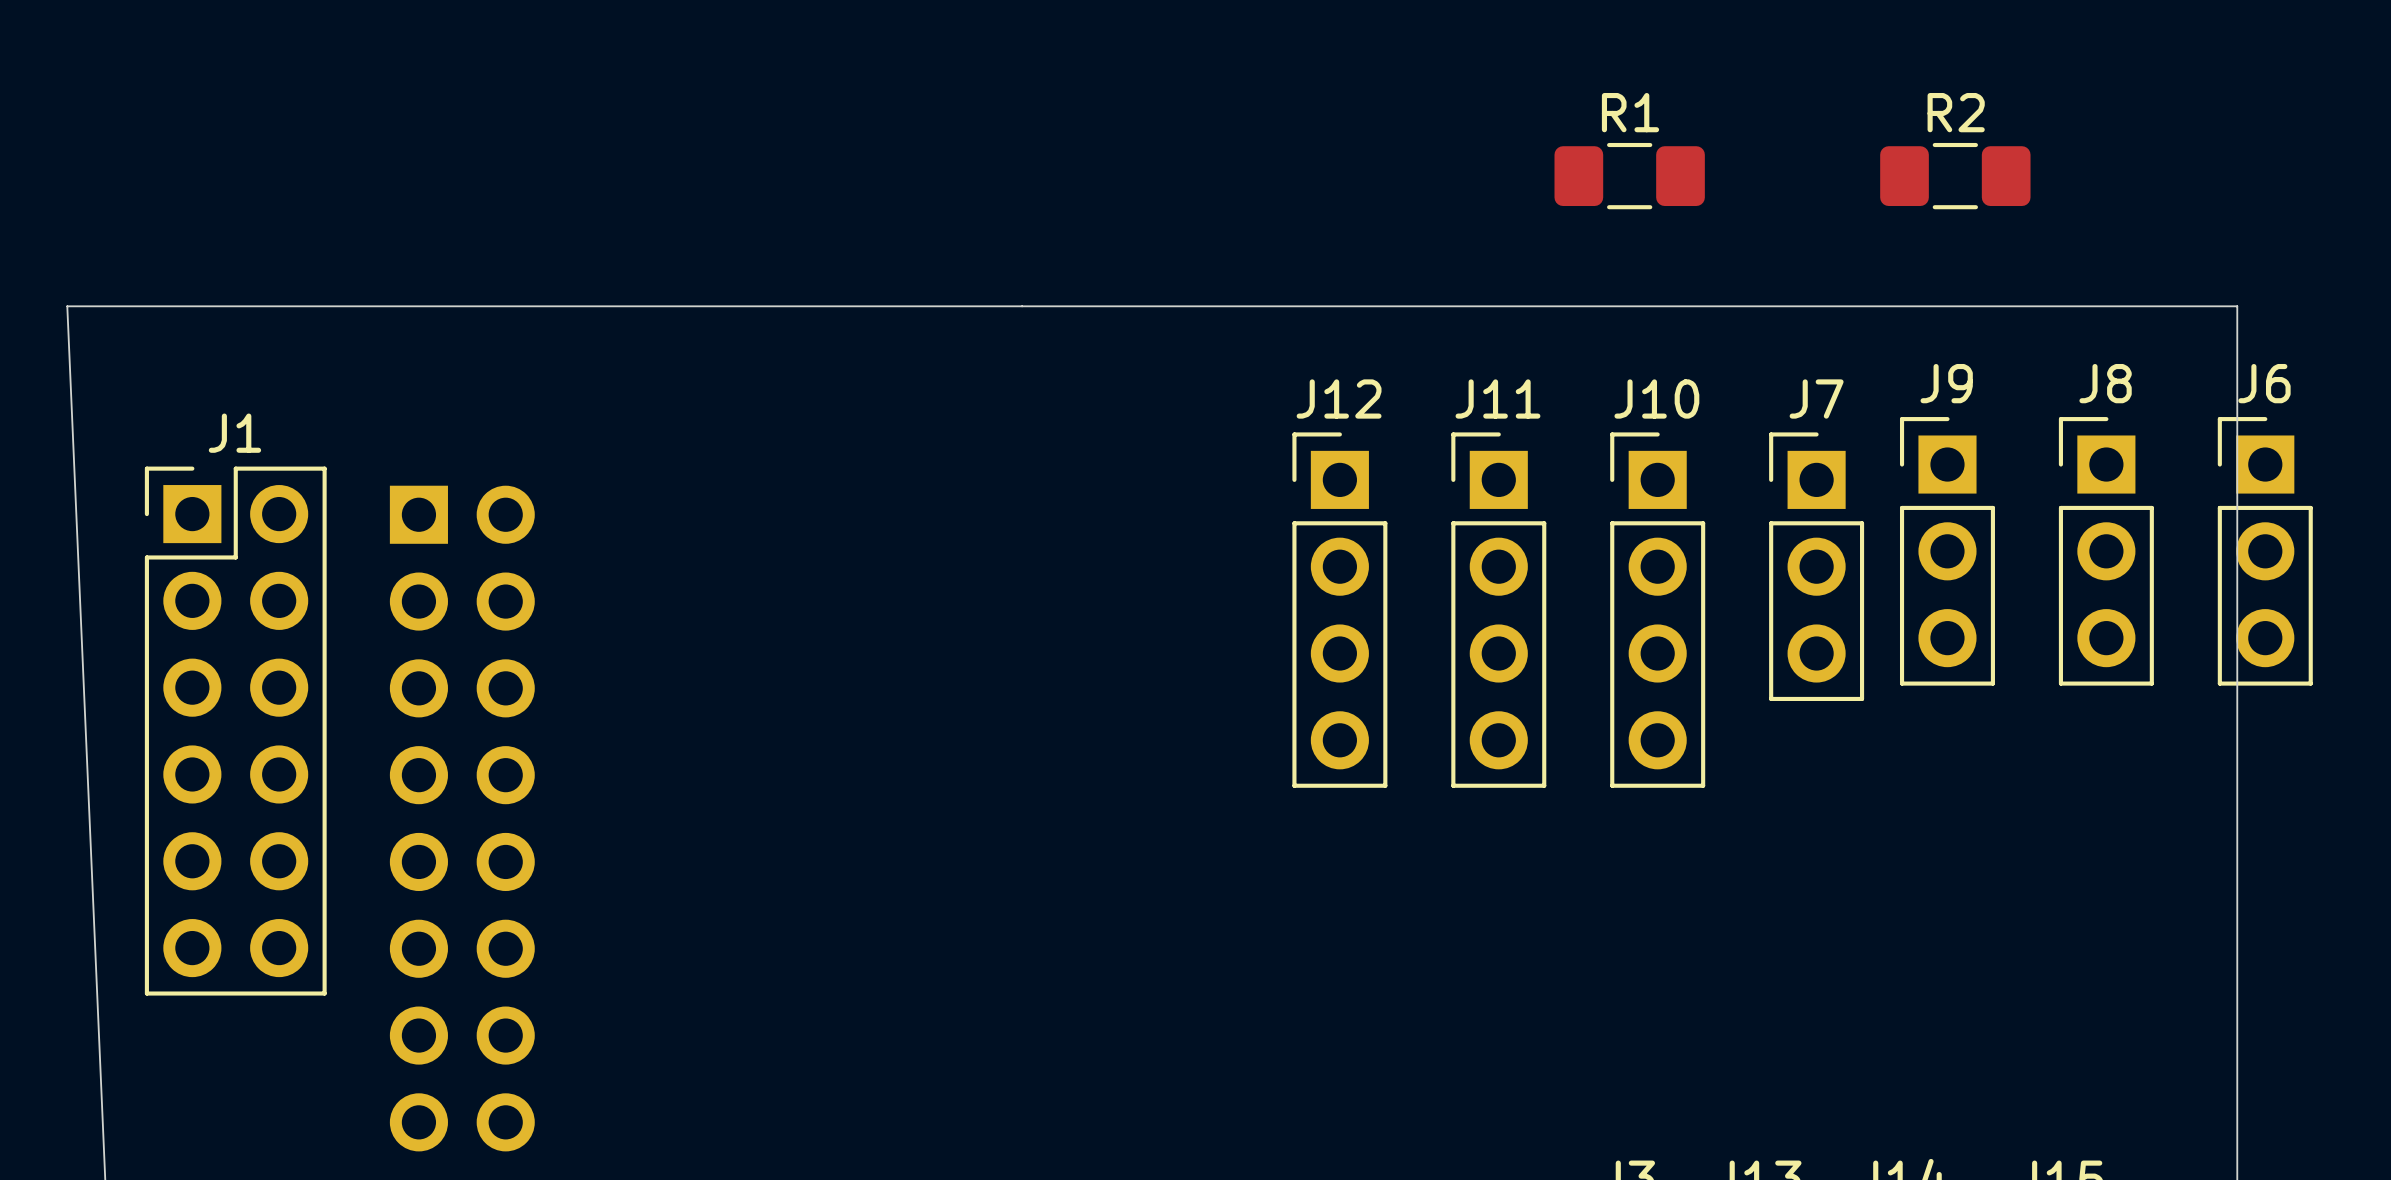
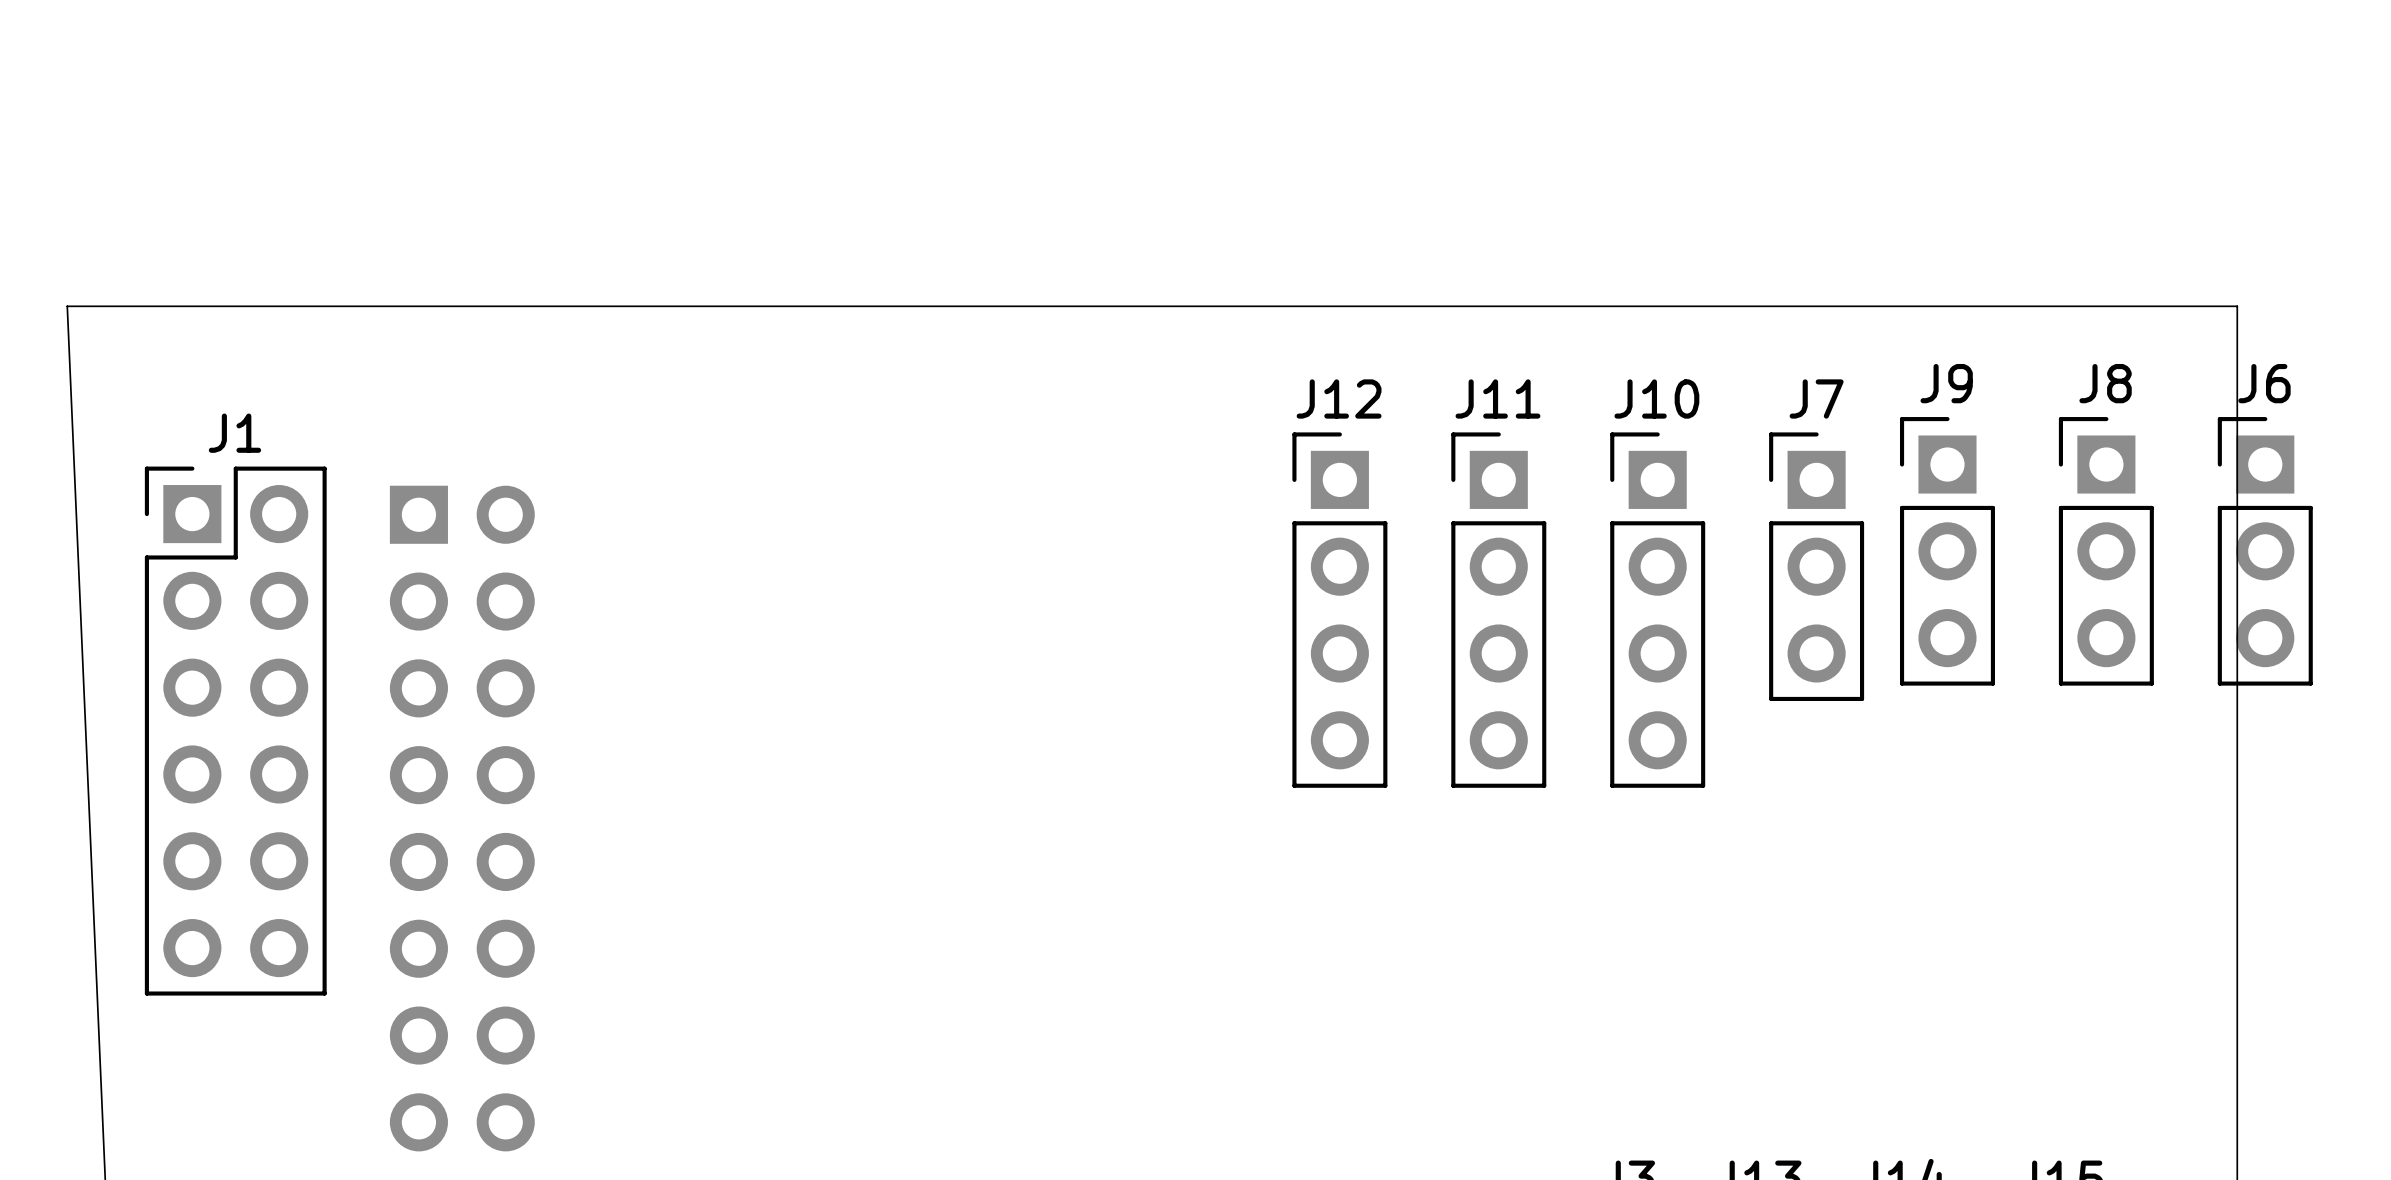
R1: (1629, 176) -> none
R2: (1955, 176) -> none

